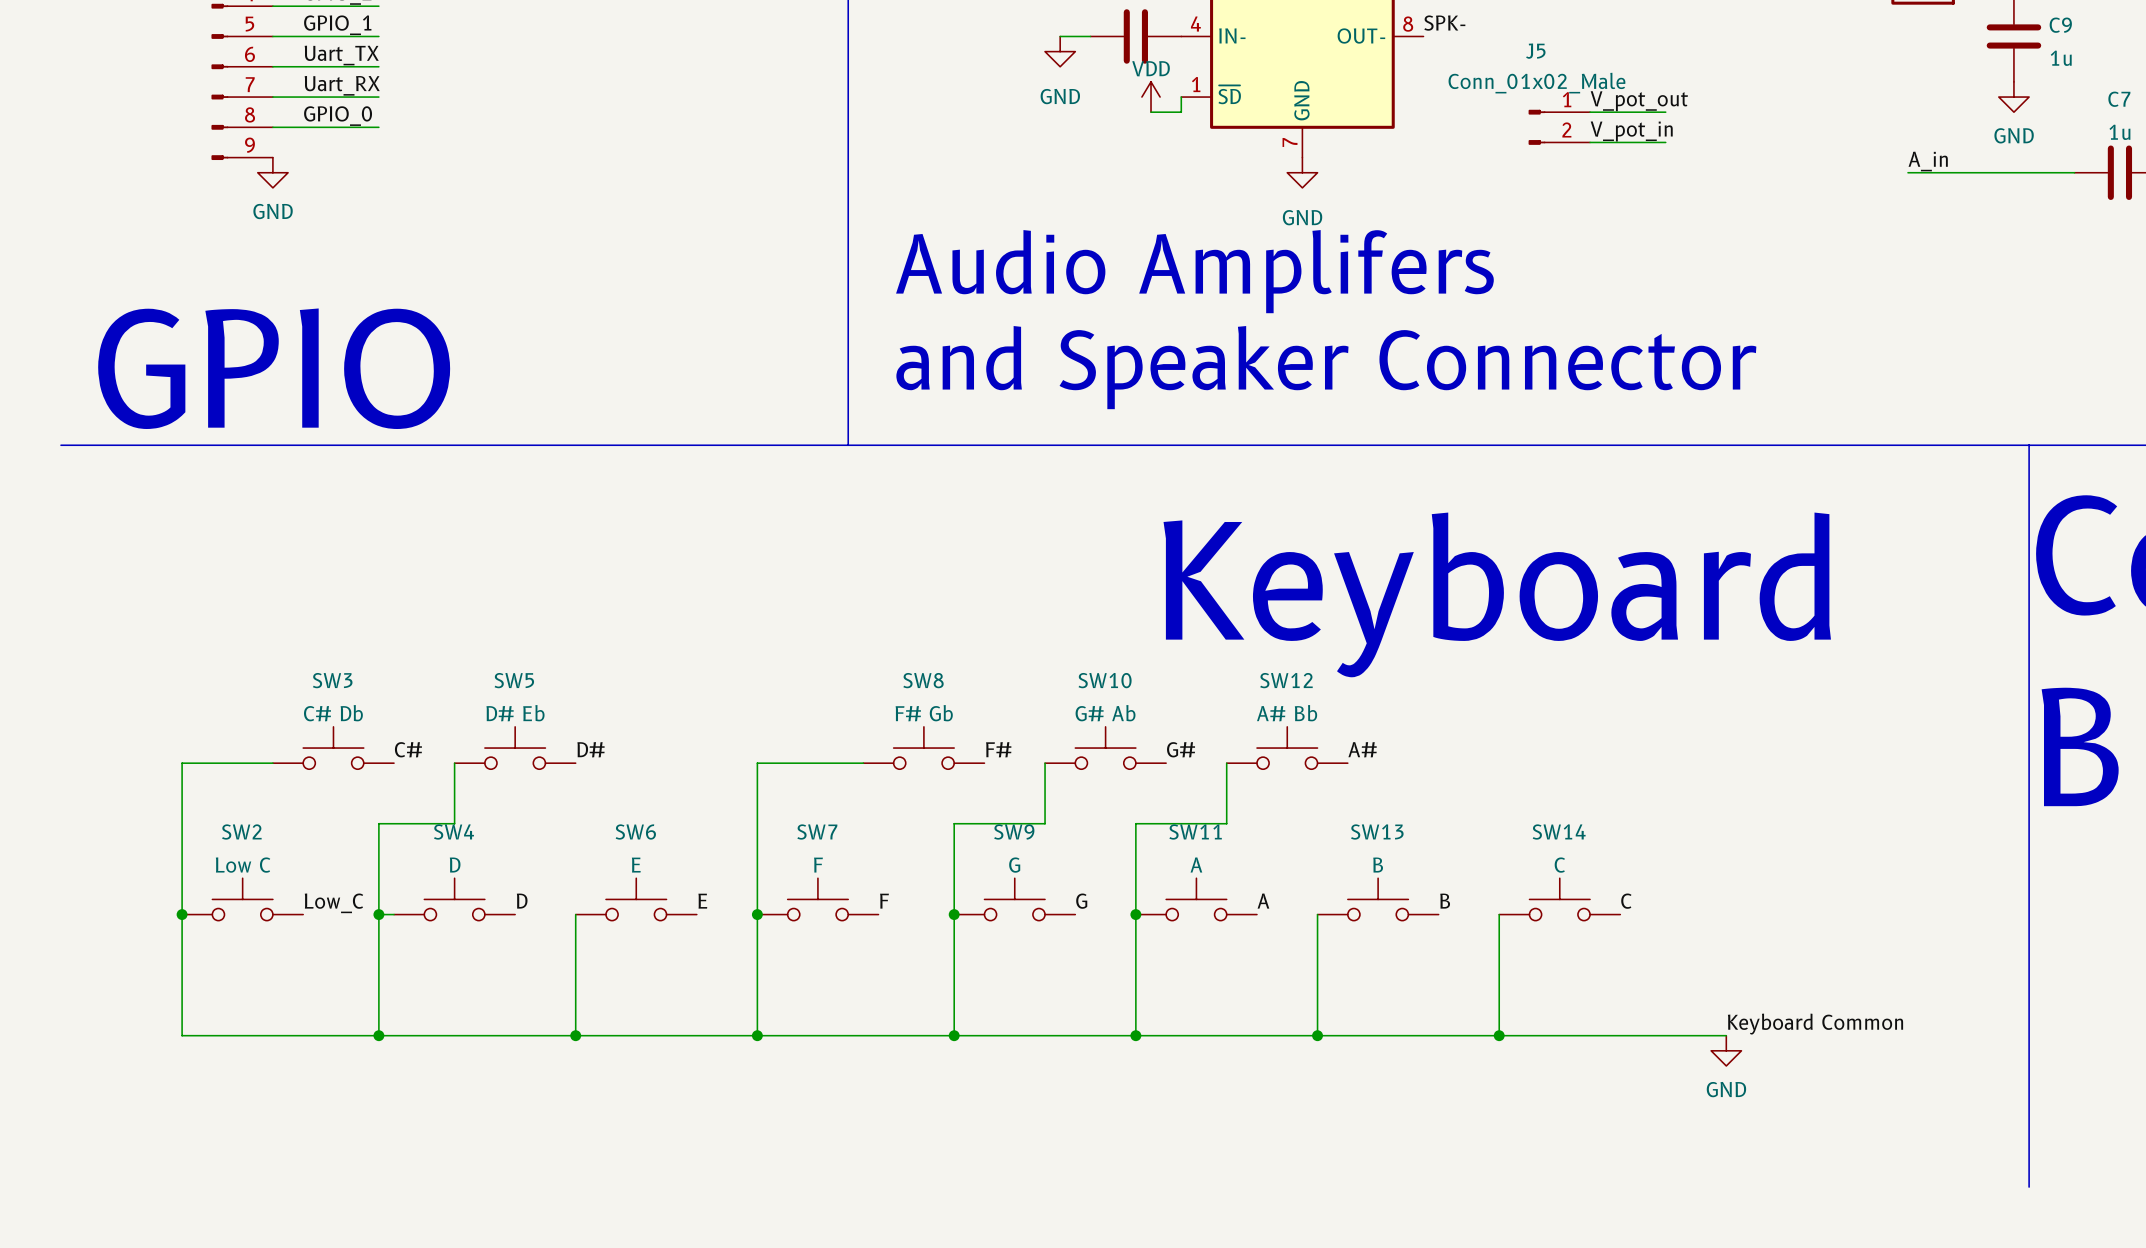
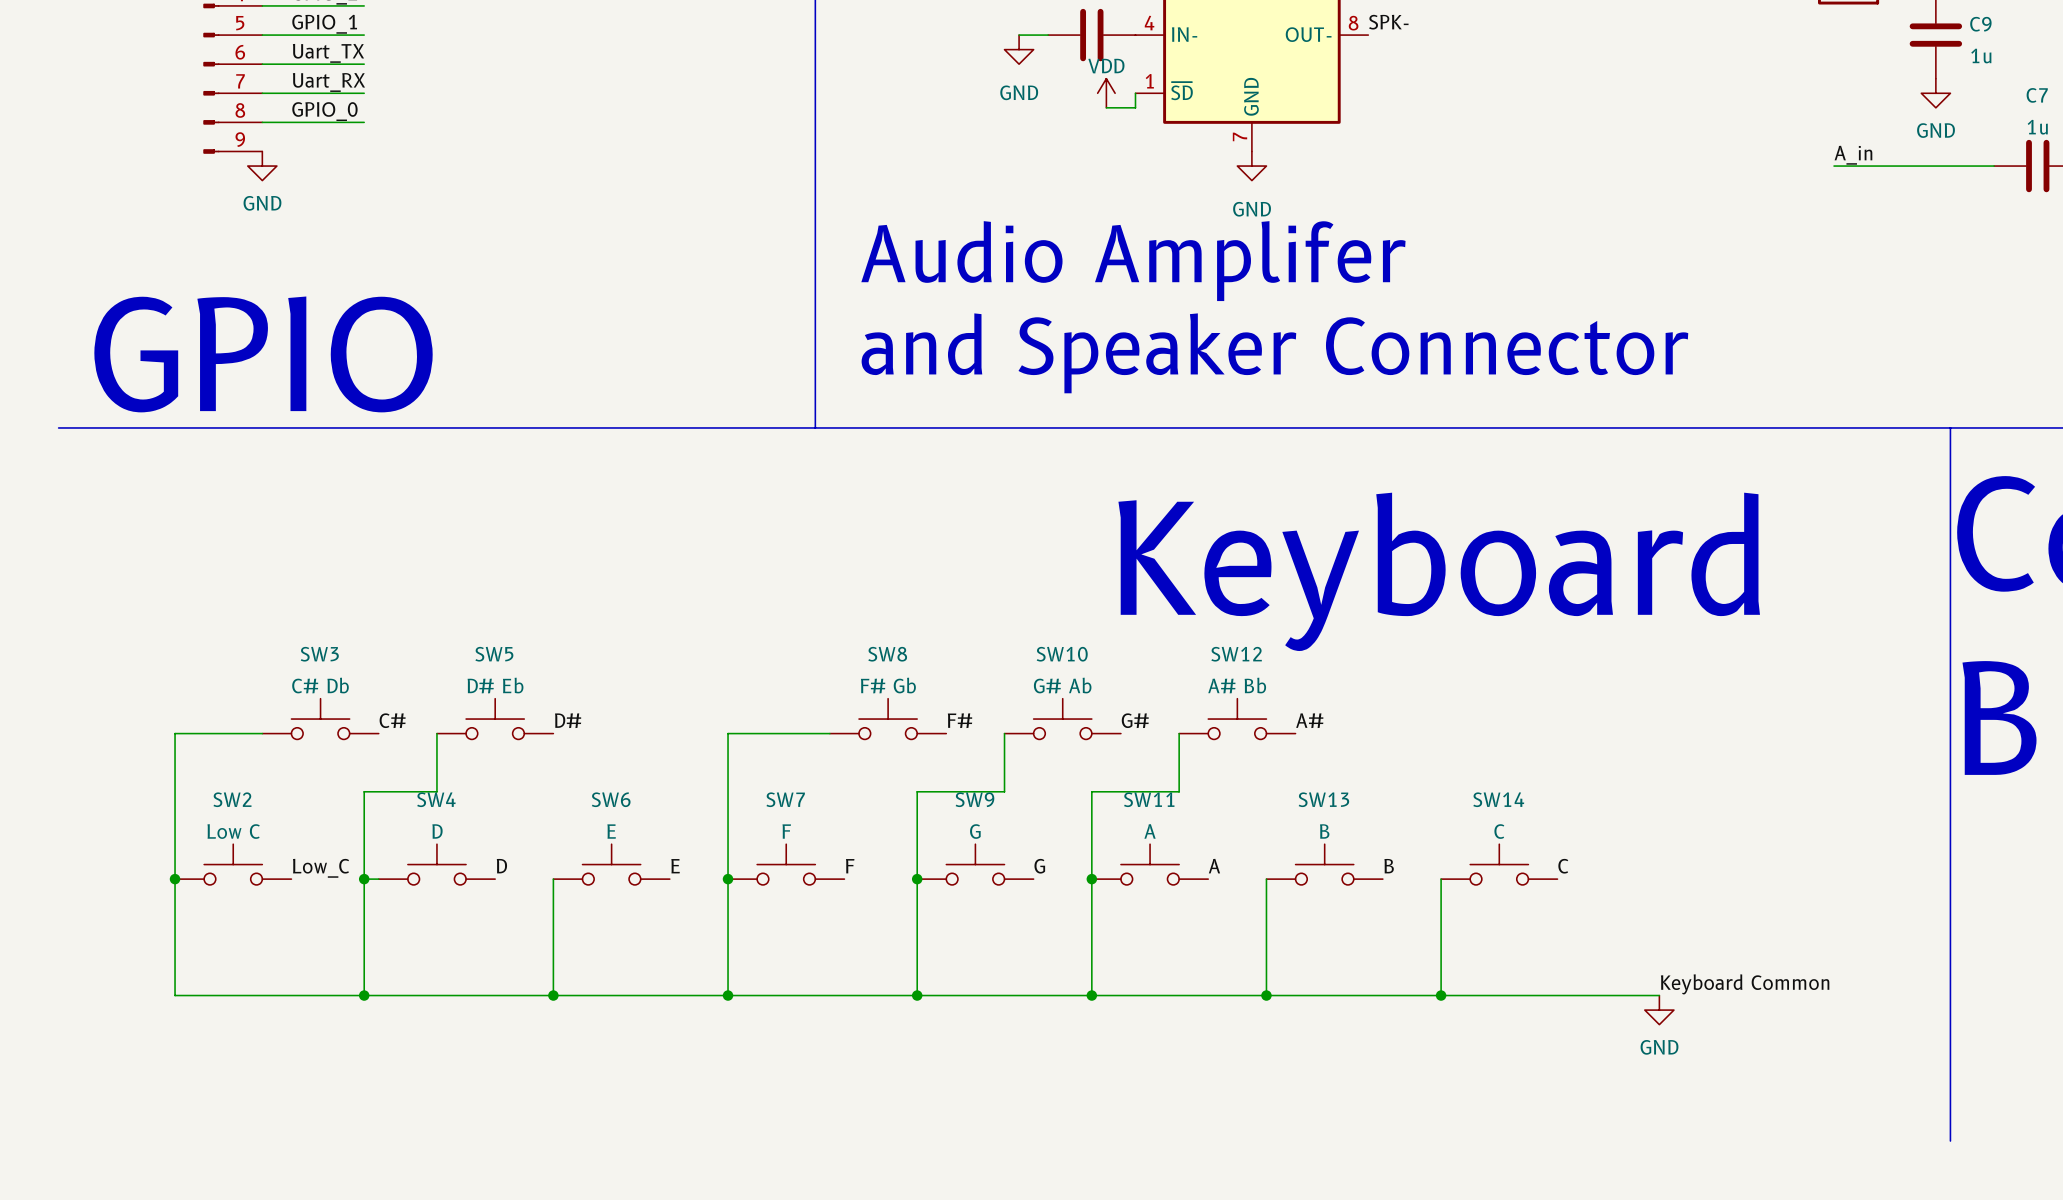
label: V_pot_out (1639, 101) -> none
wire: (1590, 112) (1665, 112) -> none
J5: Conn_01x02_Male (1559, 127) -> none
label: V_pot_in (1631, 131) -> none
wire: (1590, 142) (1665, 142) -> none
text: Audio Amplifers (1194, 271) -> Audio Amplifer (1133, 261)

